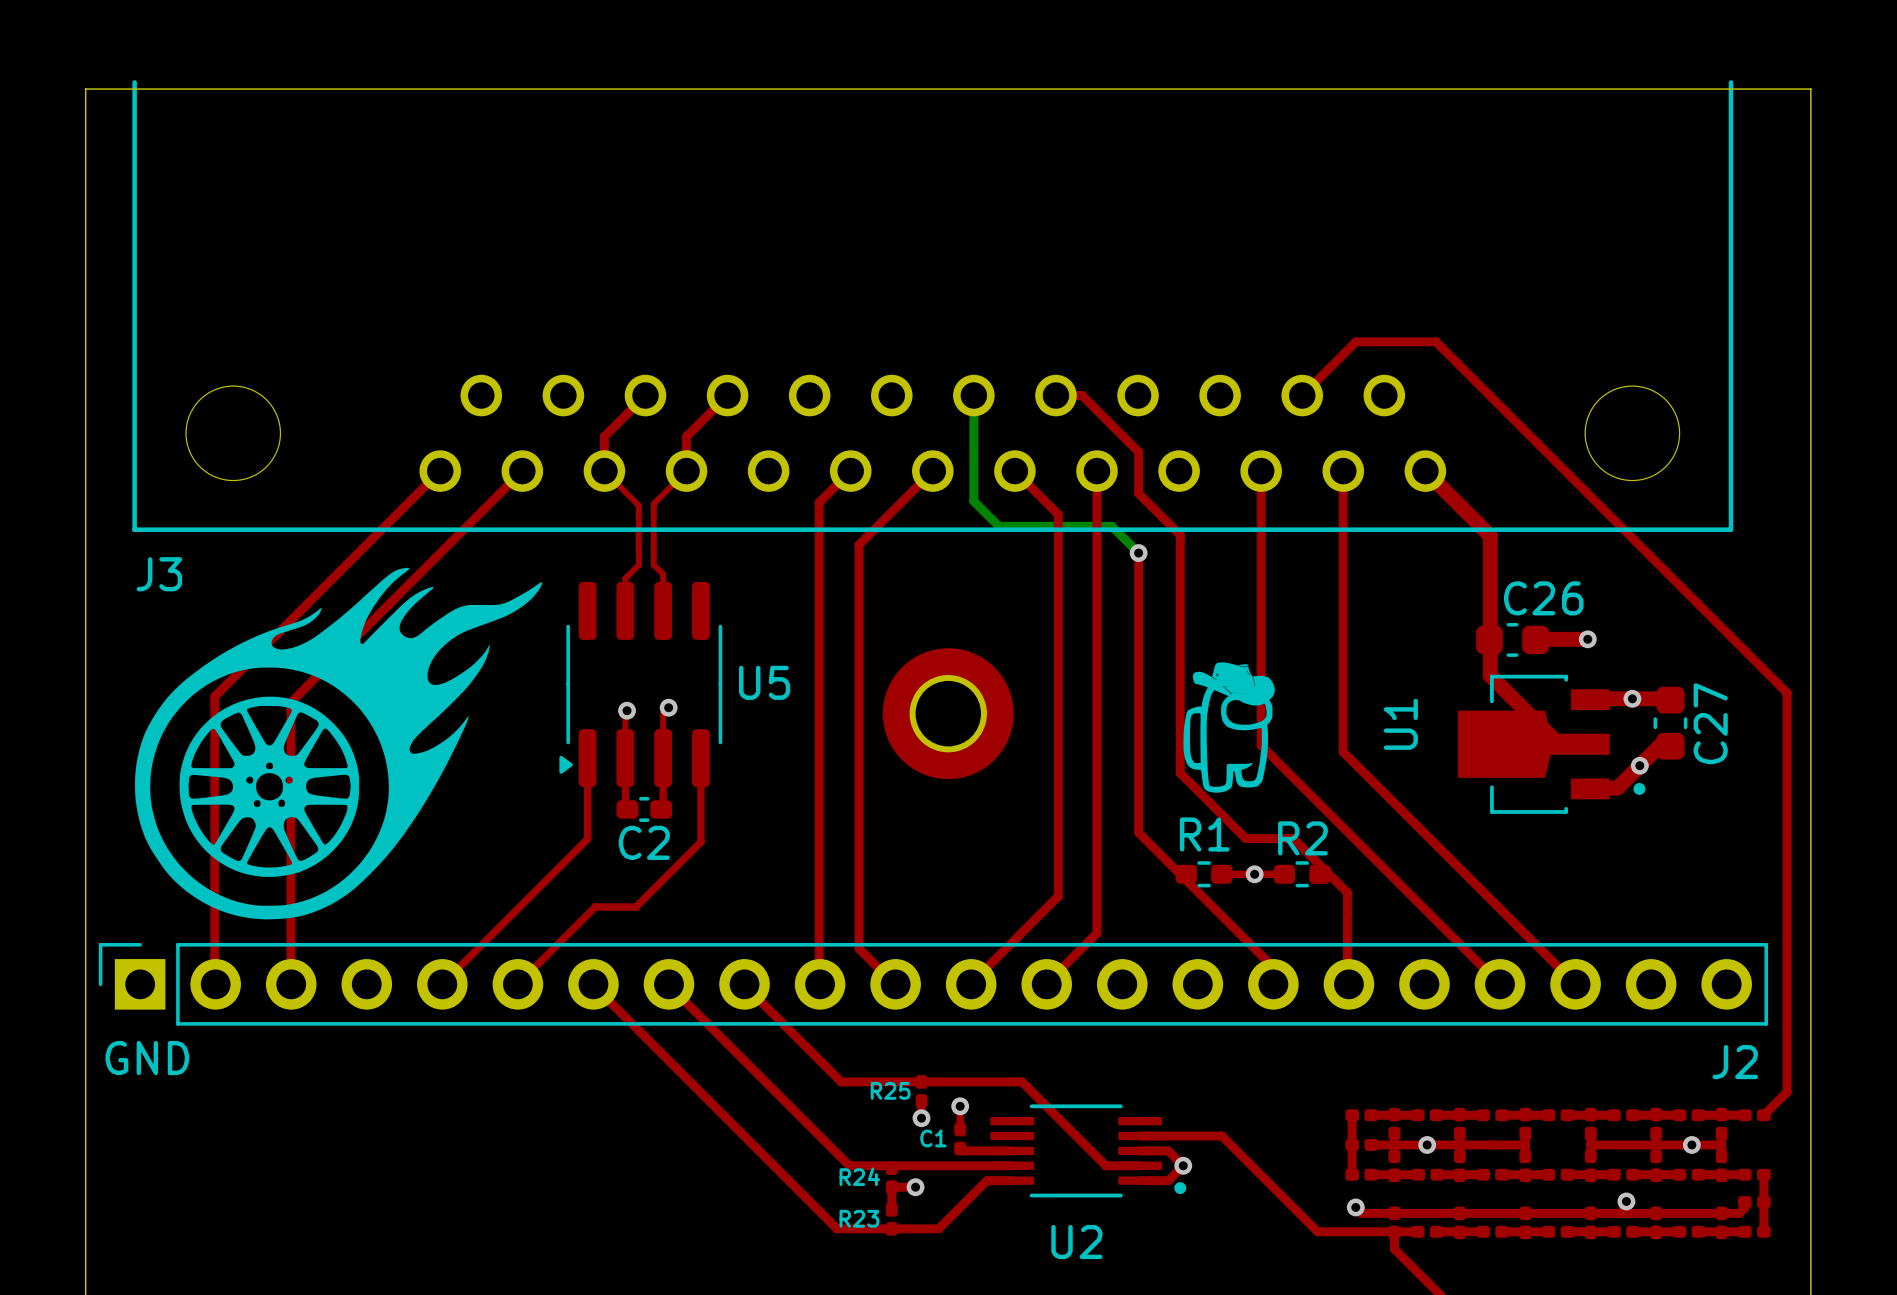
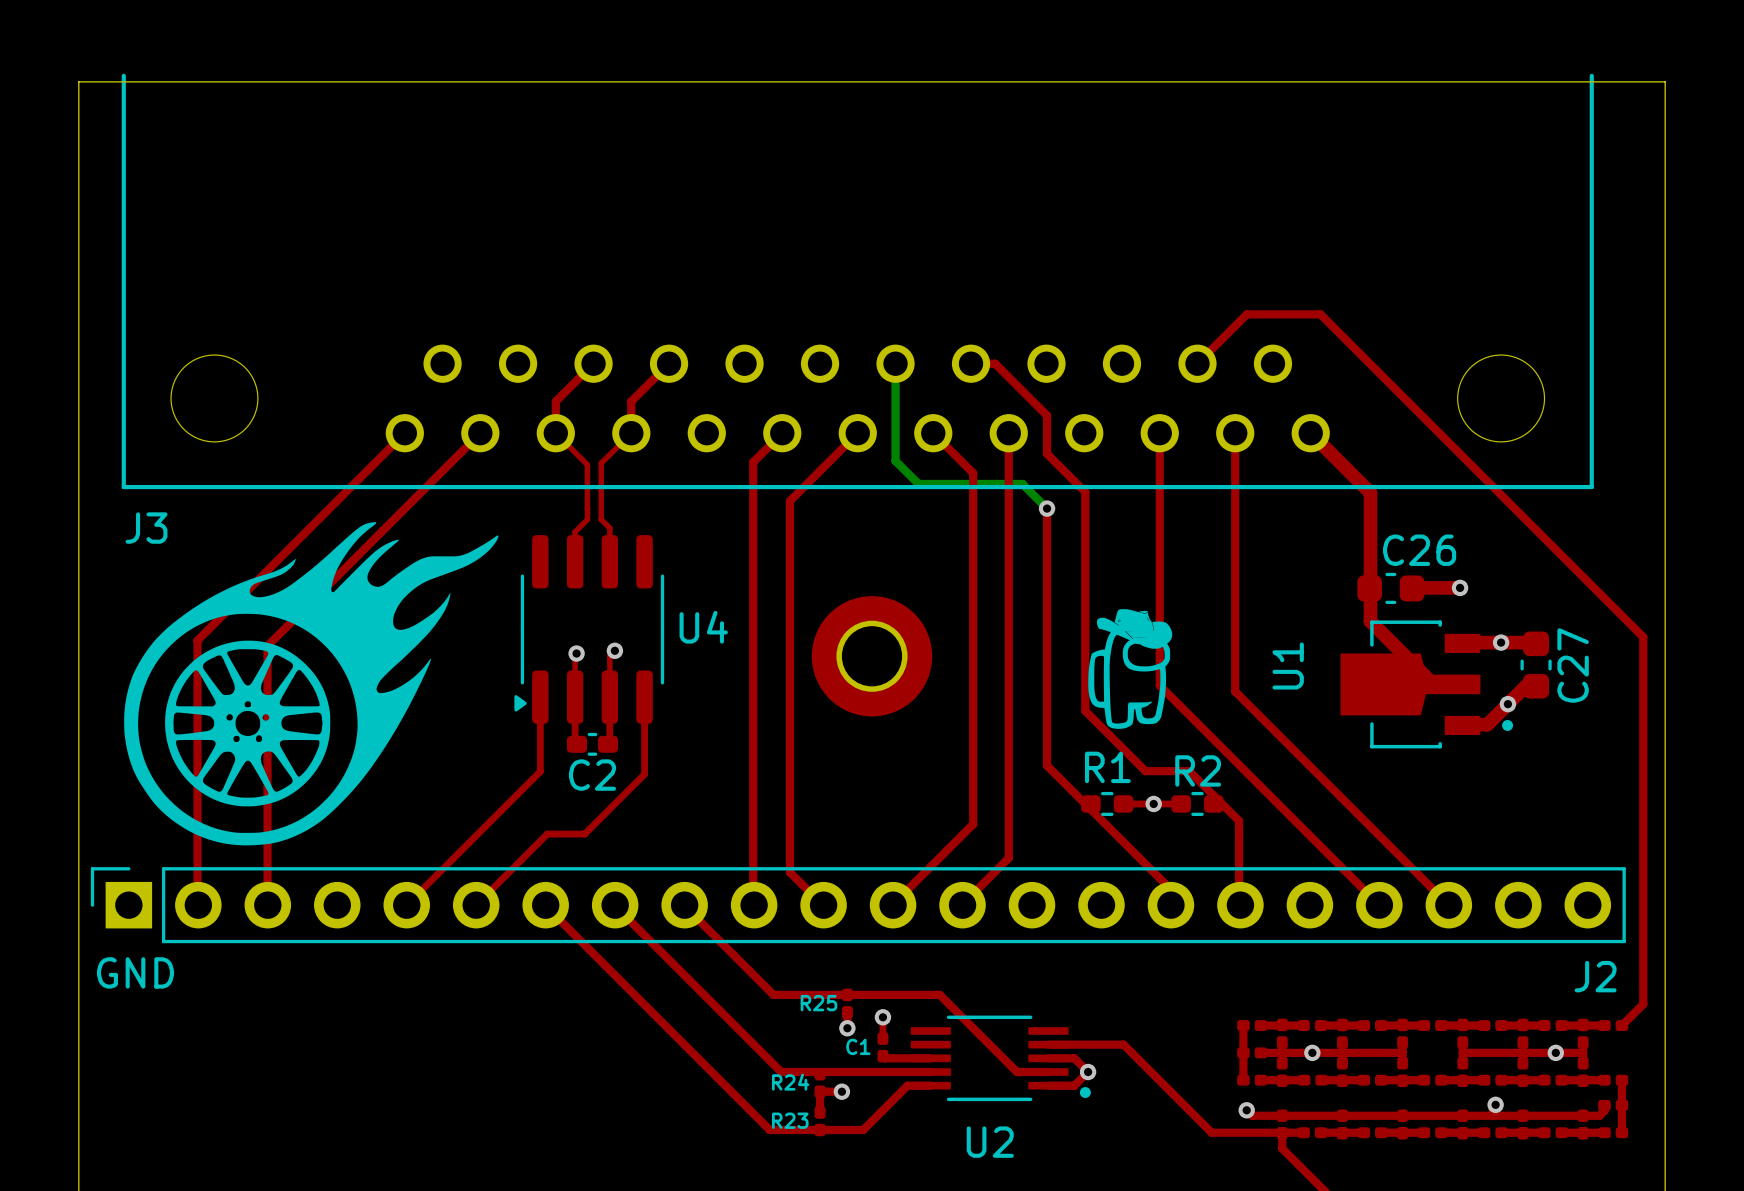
U5 name: U5 (764, 682) -> U4 (703, 627)

